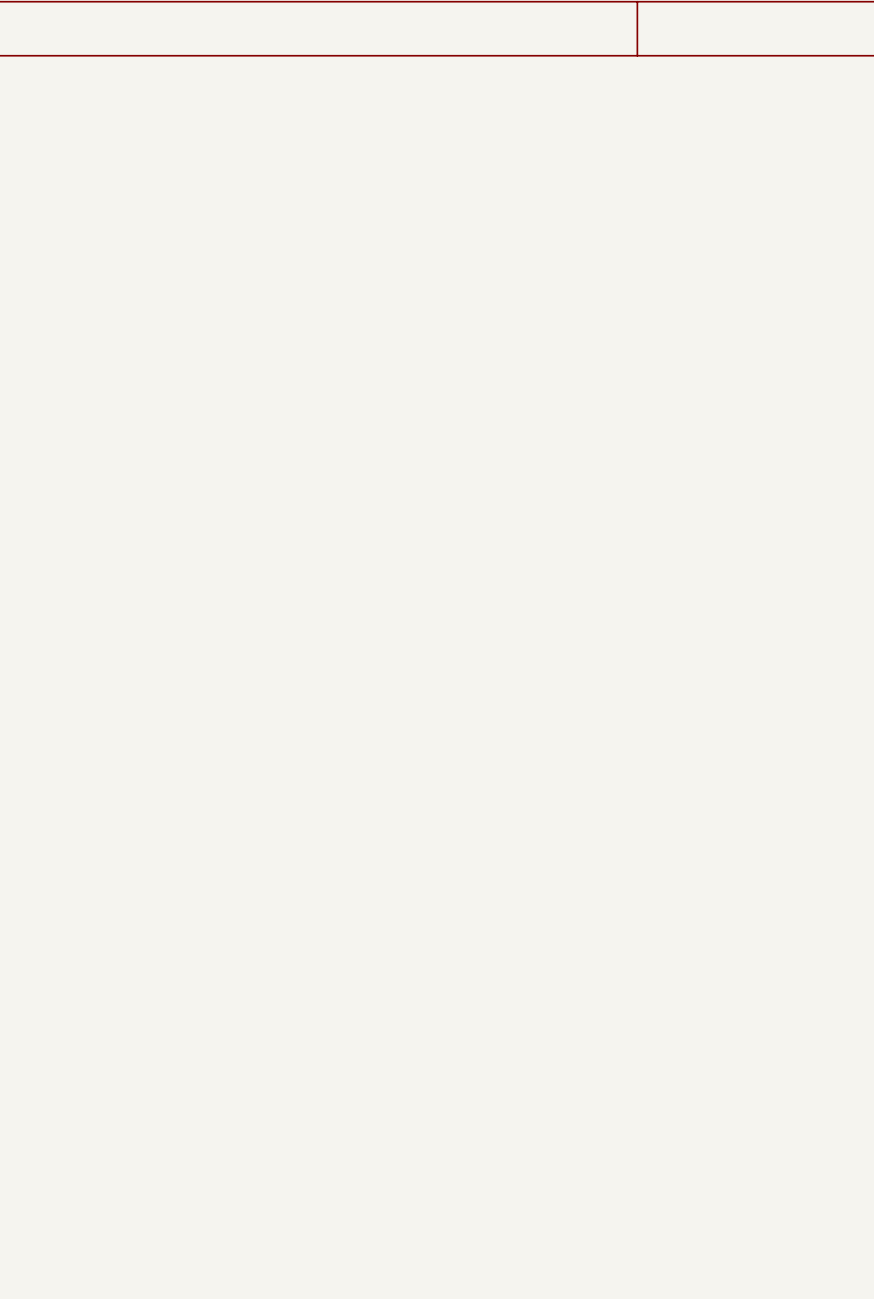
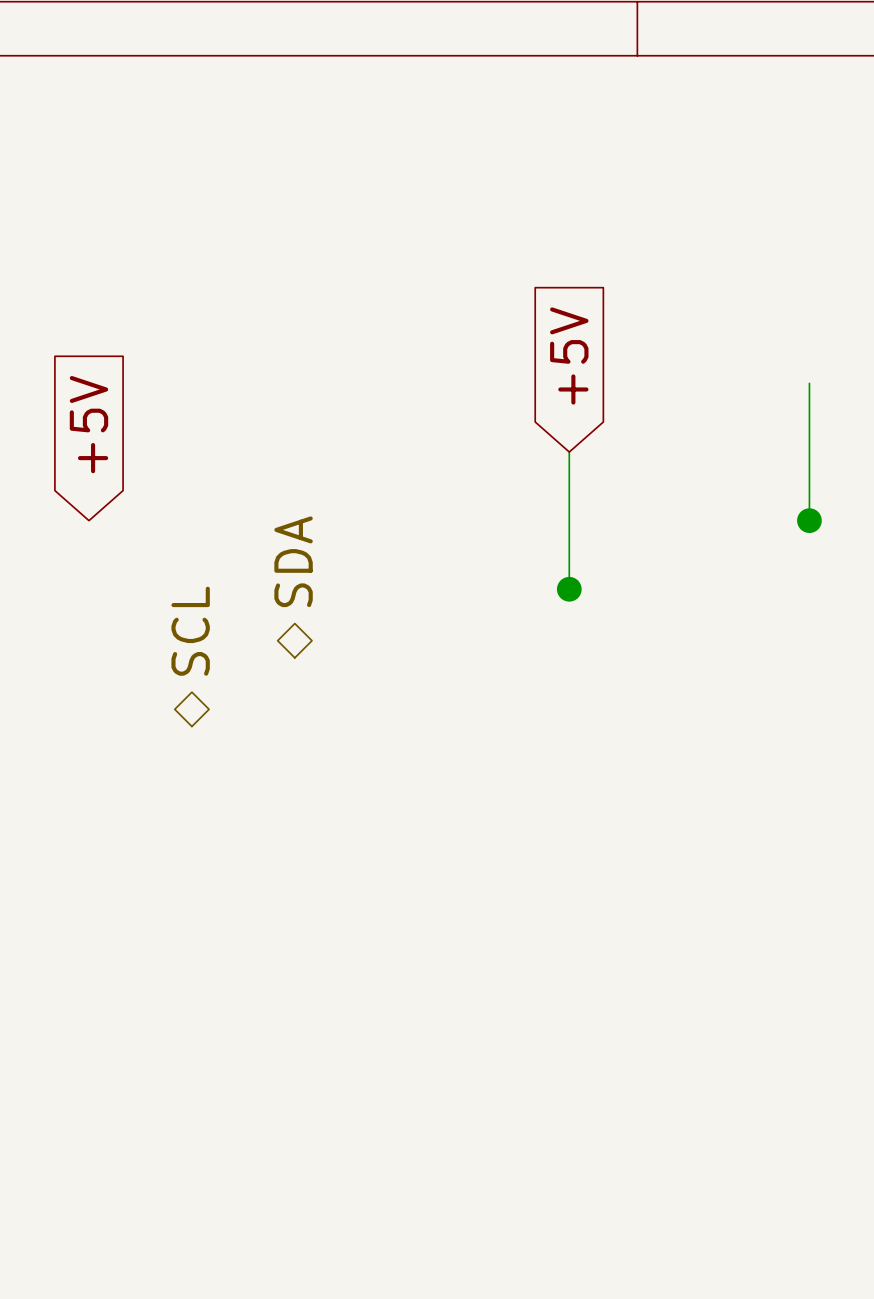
global label: none -> +5V (569, 356)
wire: none -> (809, 383) (809, 520)
global label: none -> +5V (88, 424)
wire: none -> (569, 452) (569, 589)
junction: none -> (809, 520)
hierarchical label: none -> SDA (293, 561)
junction: none -> (569, 589)
hierarchical label: none -> SCL (190, 631)

